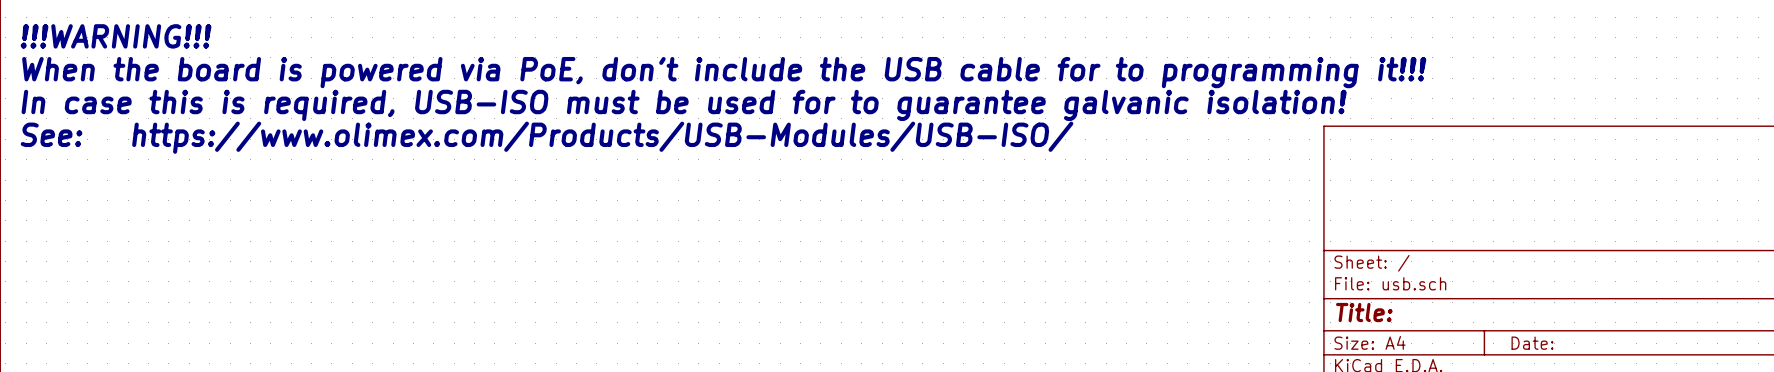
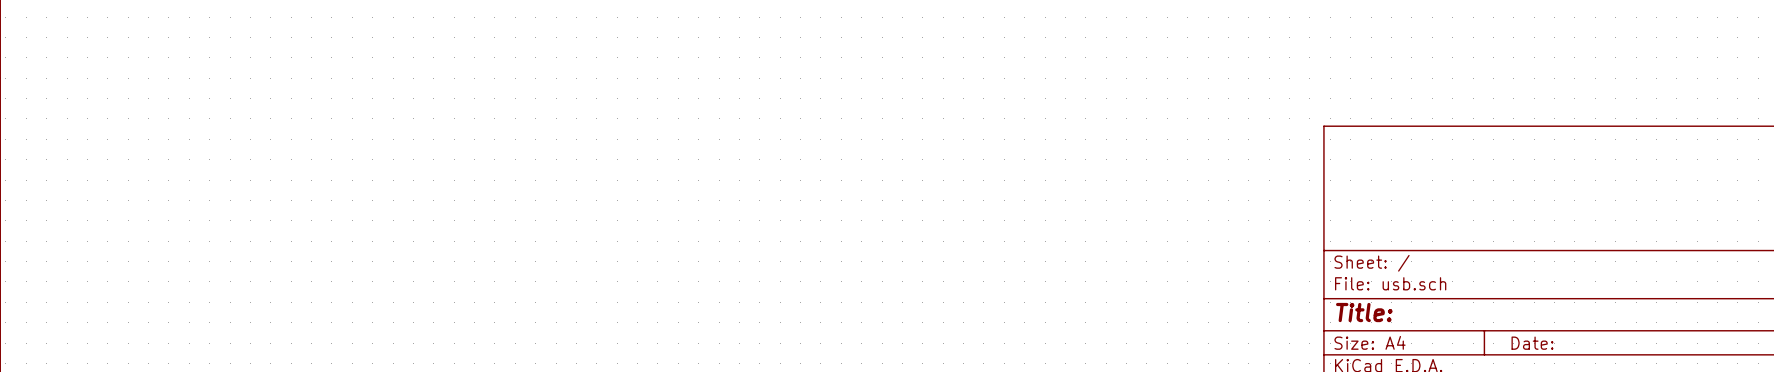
text: !!!WARNING!!! (116, 36) -> none
text: When the board is powered via PoE, don't include the USB cable for to programming it!!! (724, 72) -> none
text: In case this is required, USB-ISO must be used for to guarantee galvanic isolation! (684, 105) -> none
text: See: https://www.olimex.com/Products/USB-Modules/USB-ISO/ (547, 137) -> none

